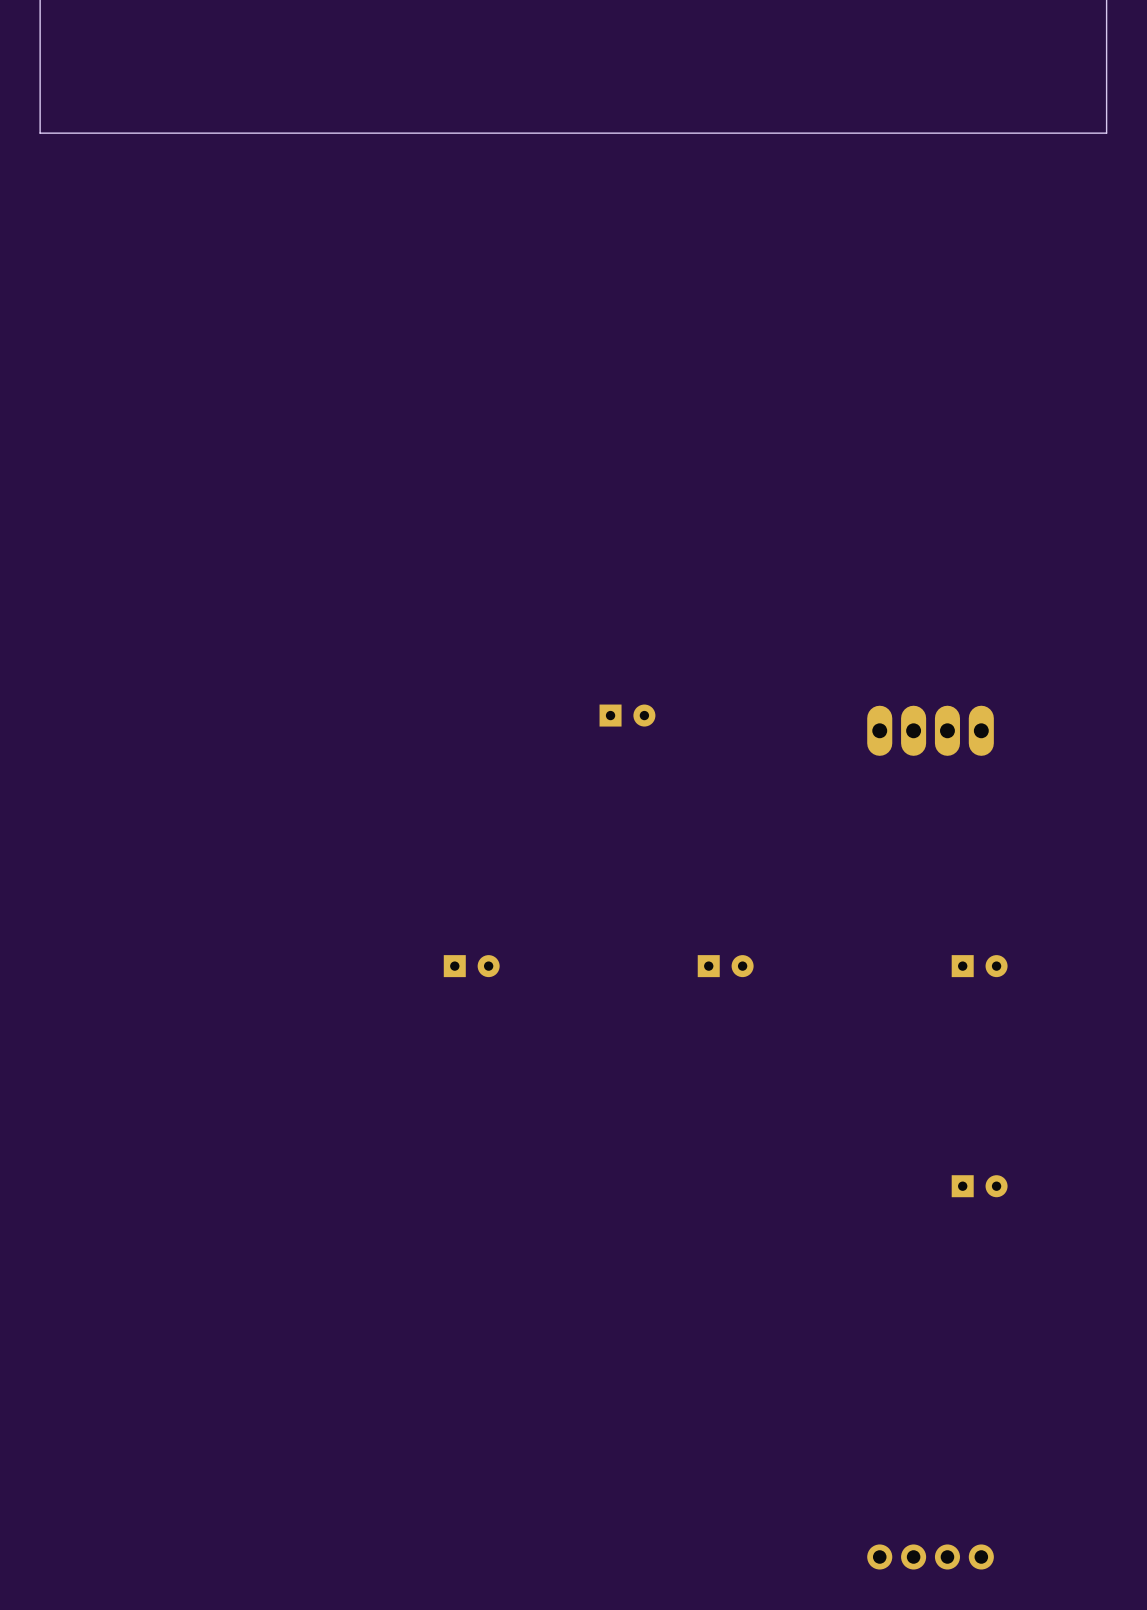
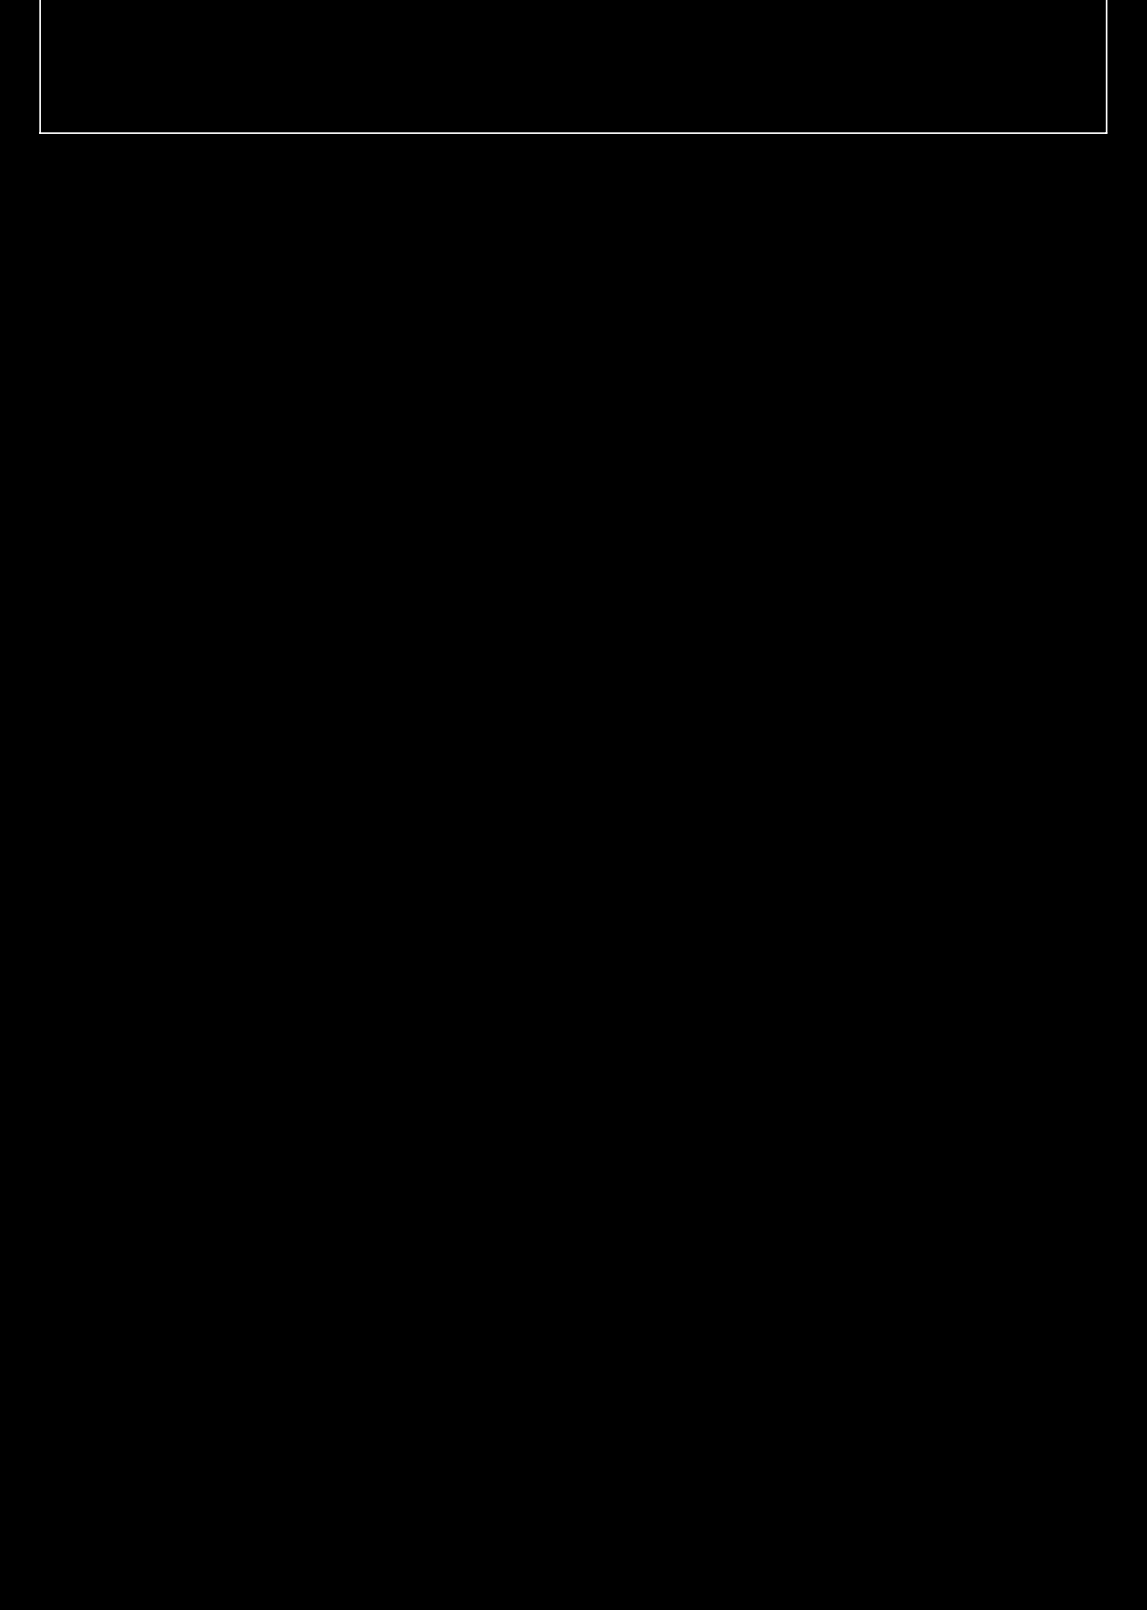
part: (627, 715) -> none
part: (930, 730) -> none
part: (471, 966) -> none
part: (725, 966) -> none
part: (979, 966) -> none
part: (979, 1186) -> none
part: (930, 1556) -> none

